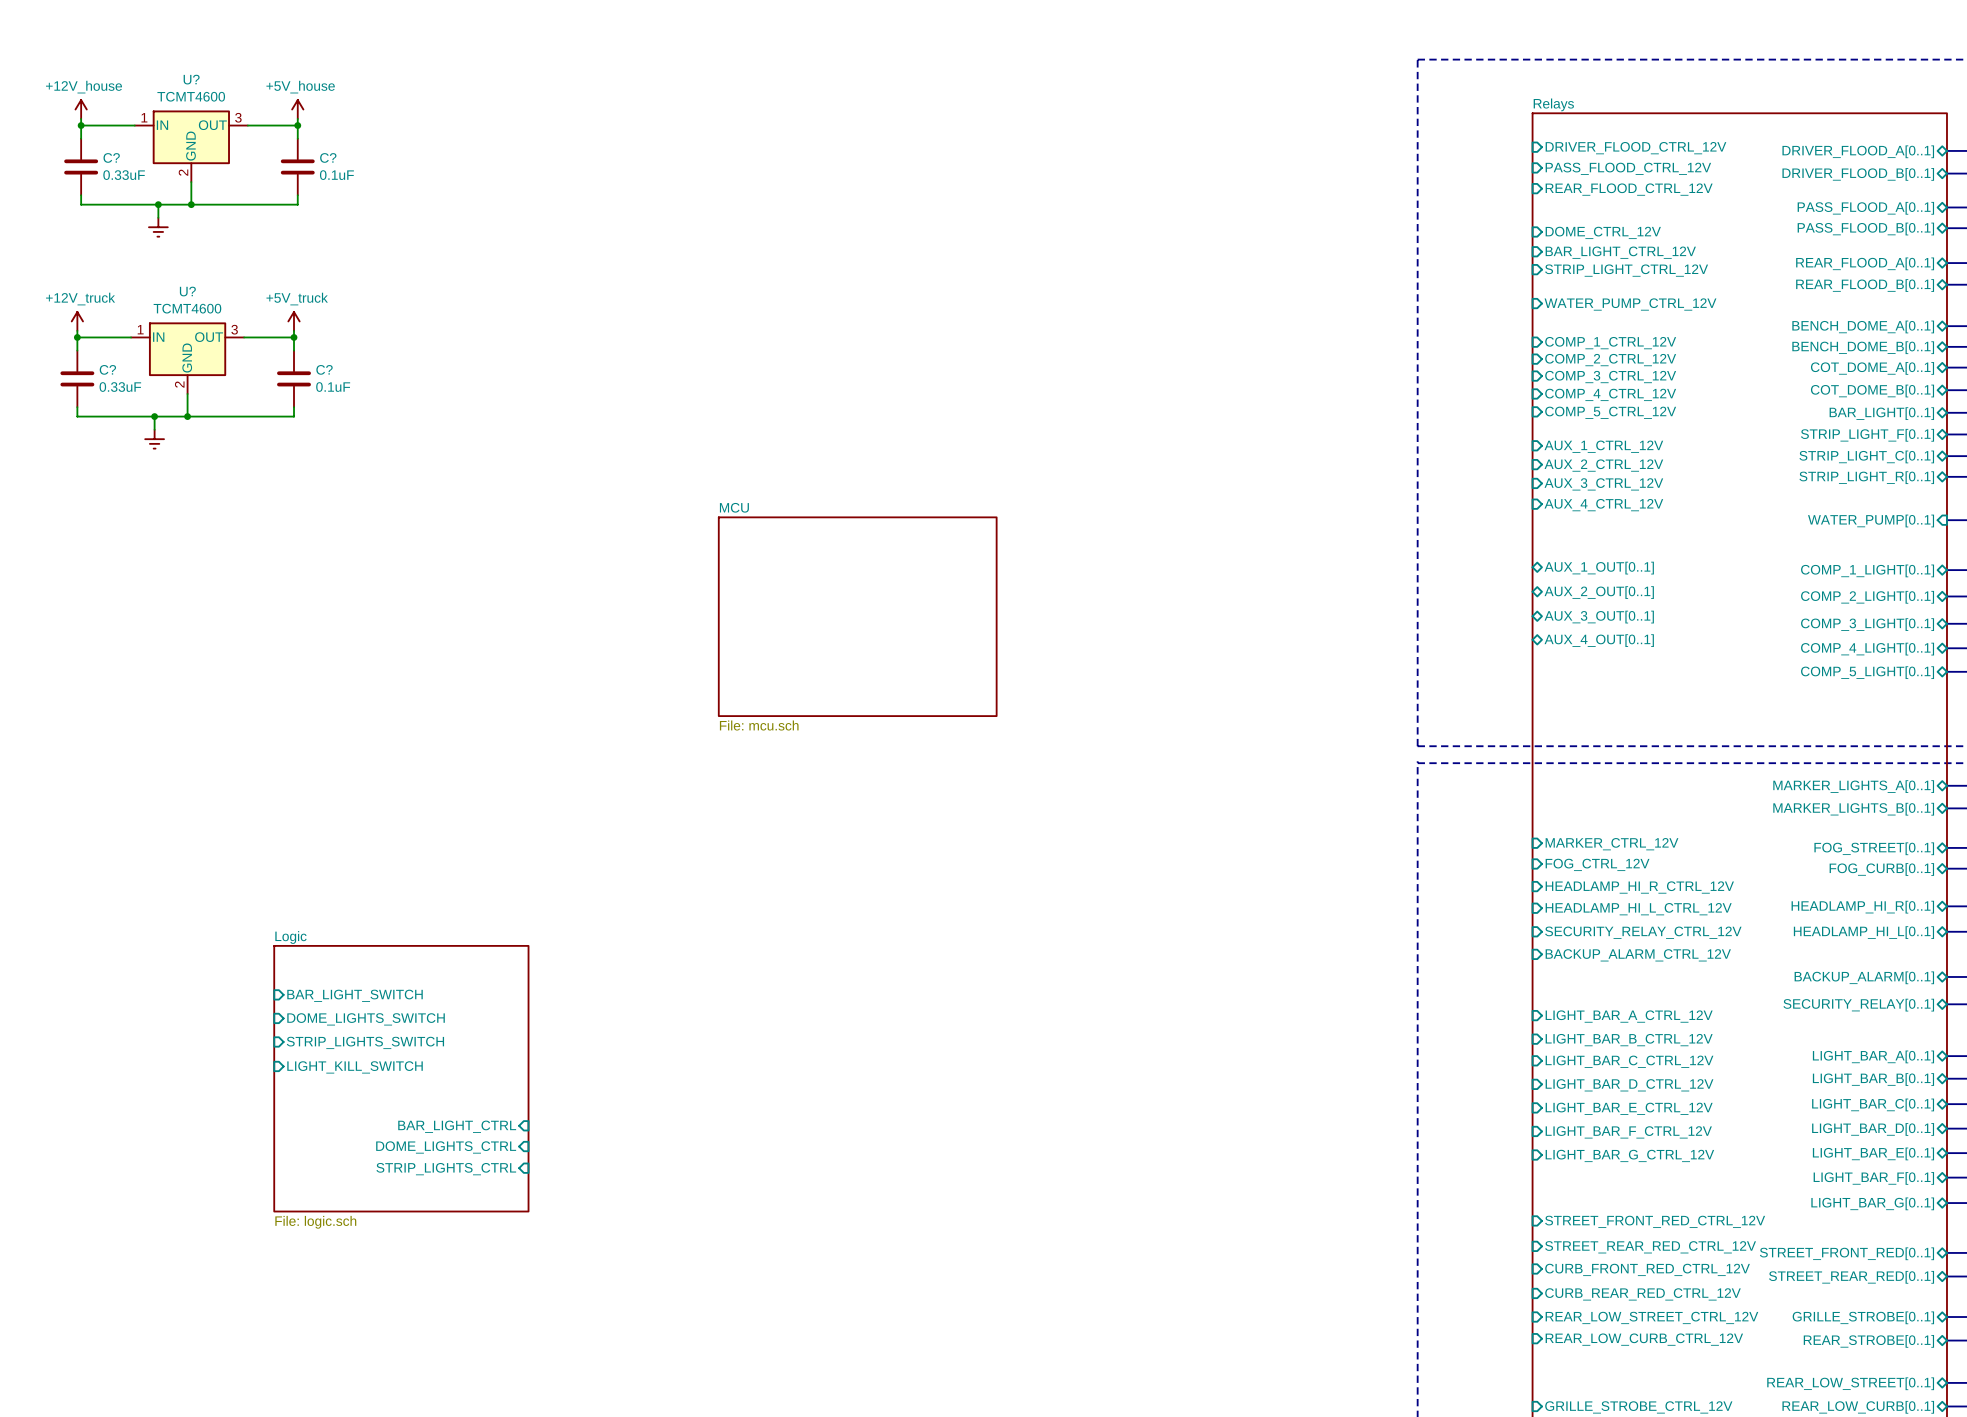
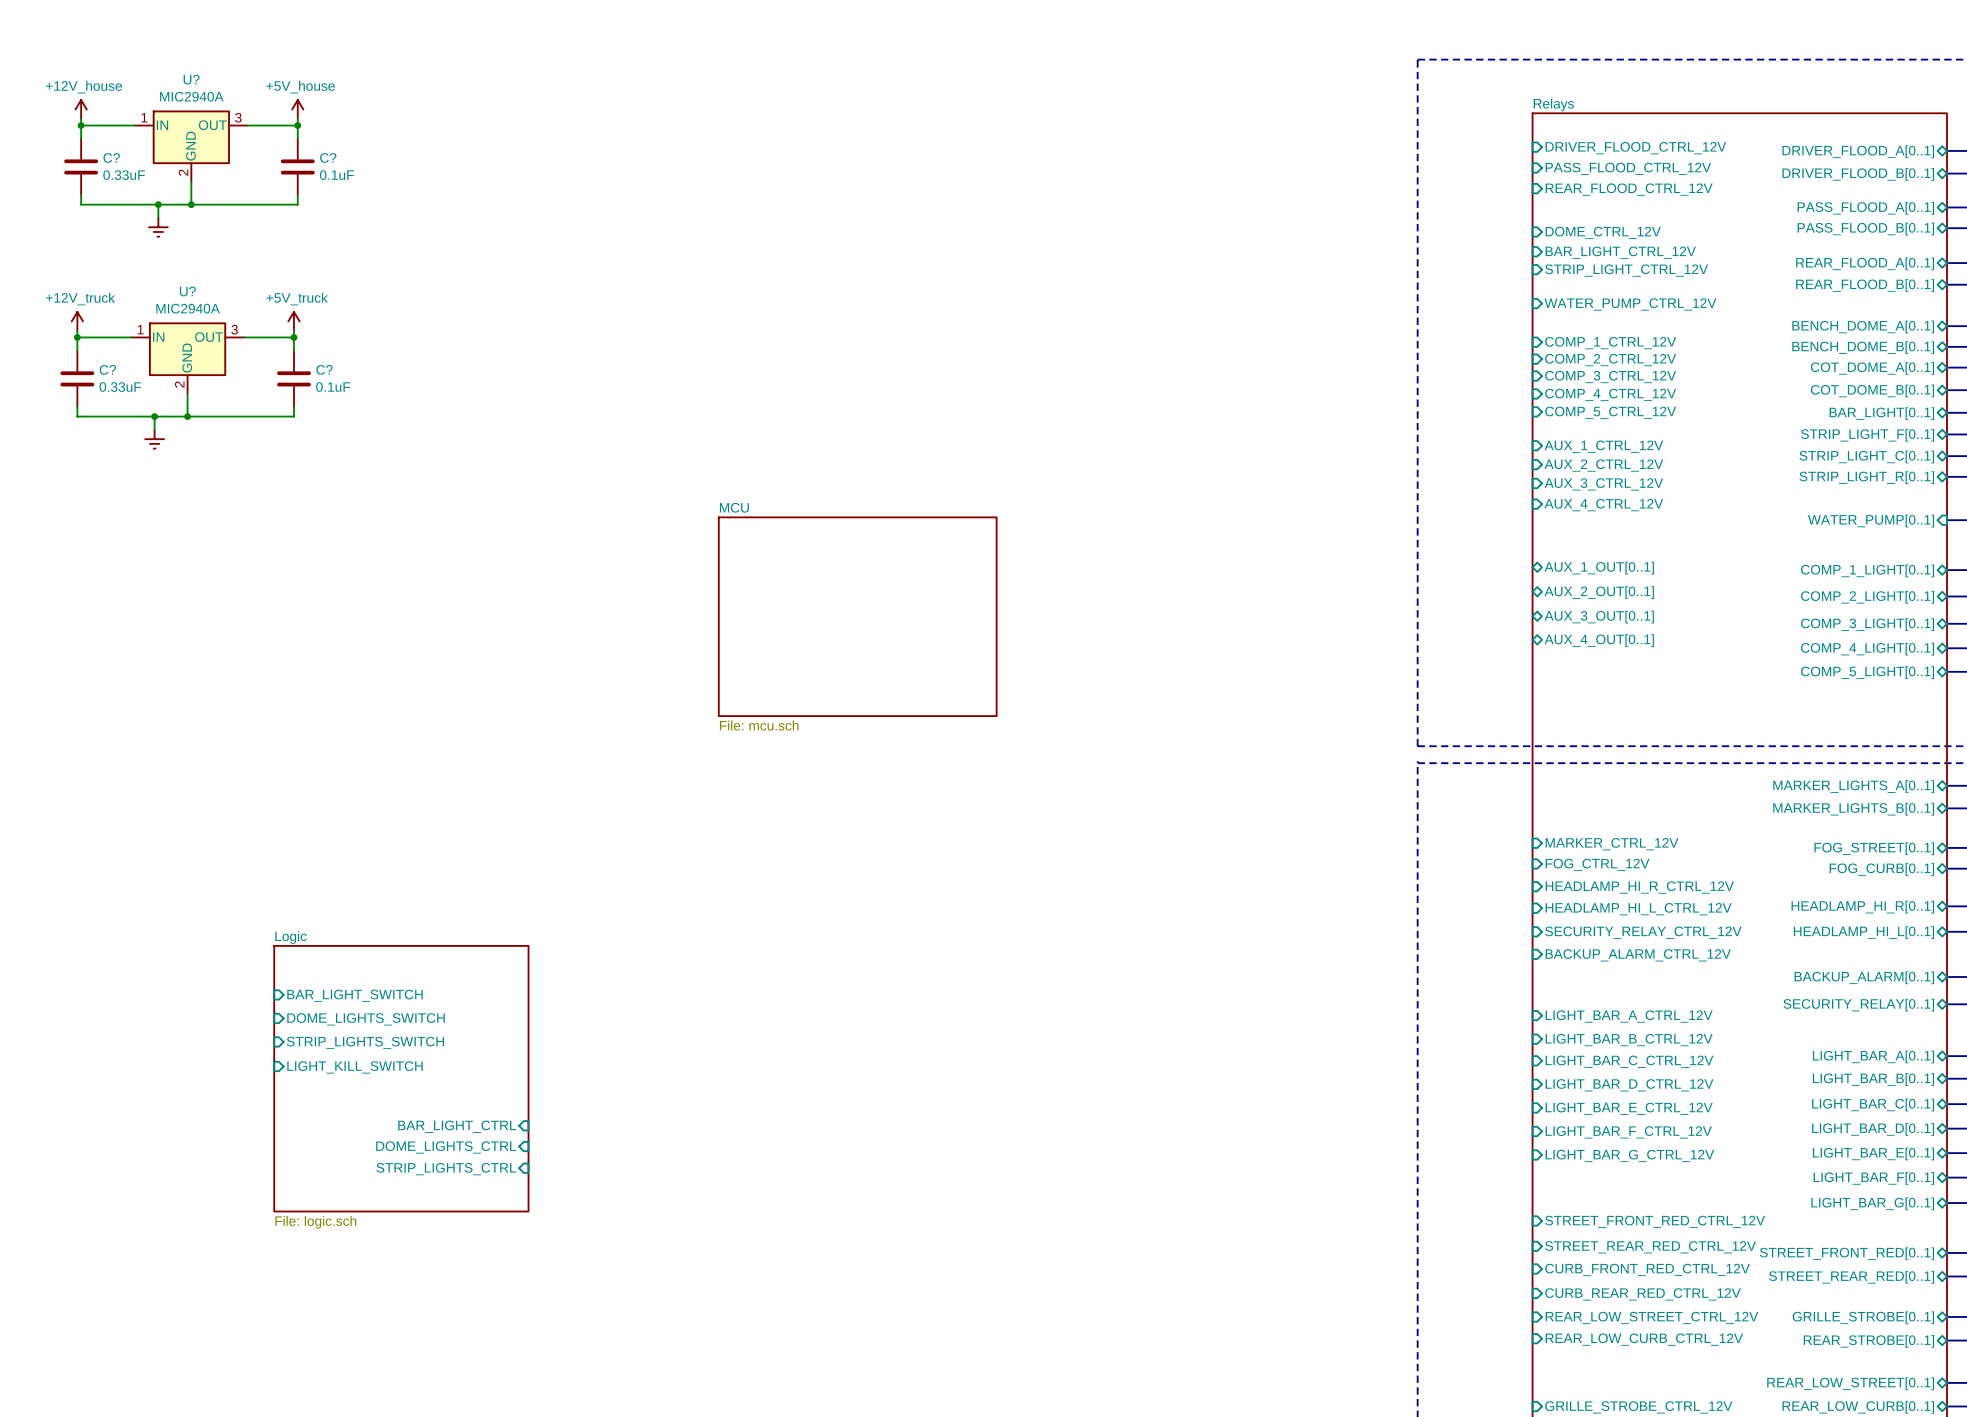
U? value: TCMT4600 (191, 96) -> MIC2940A (191, 96)
U? value: TCMT4600 (187, 308) -> MIC2940A (188, 308)

